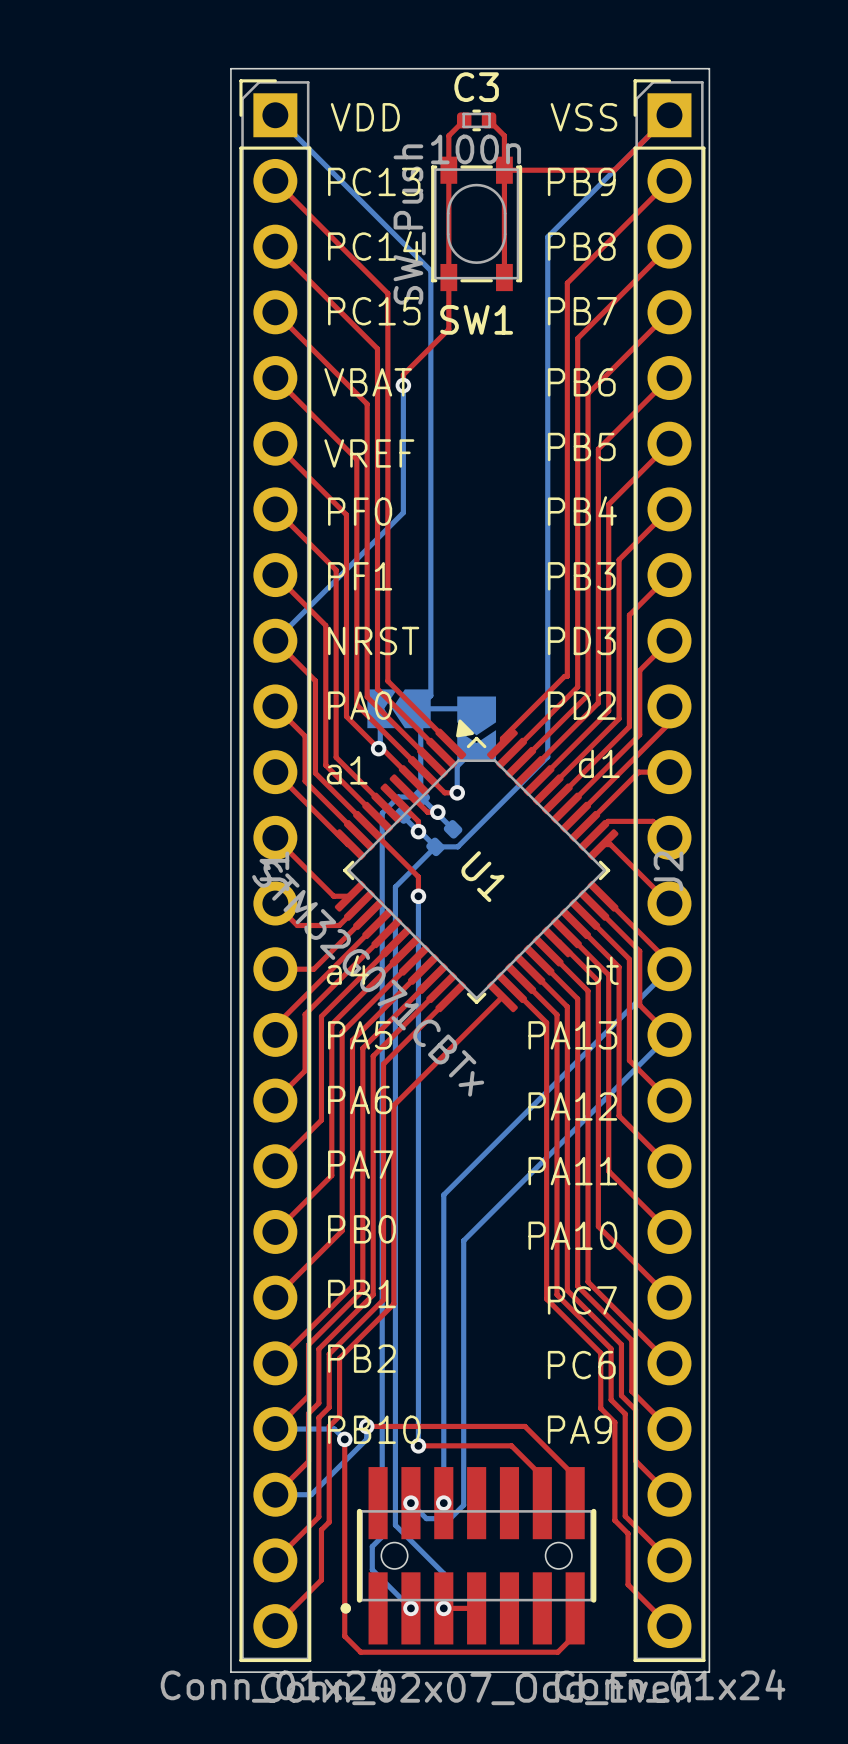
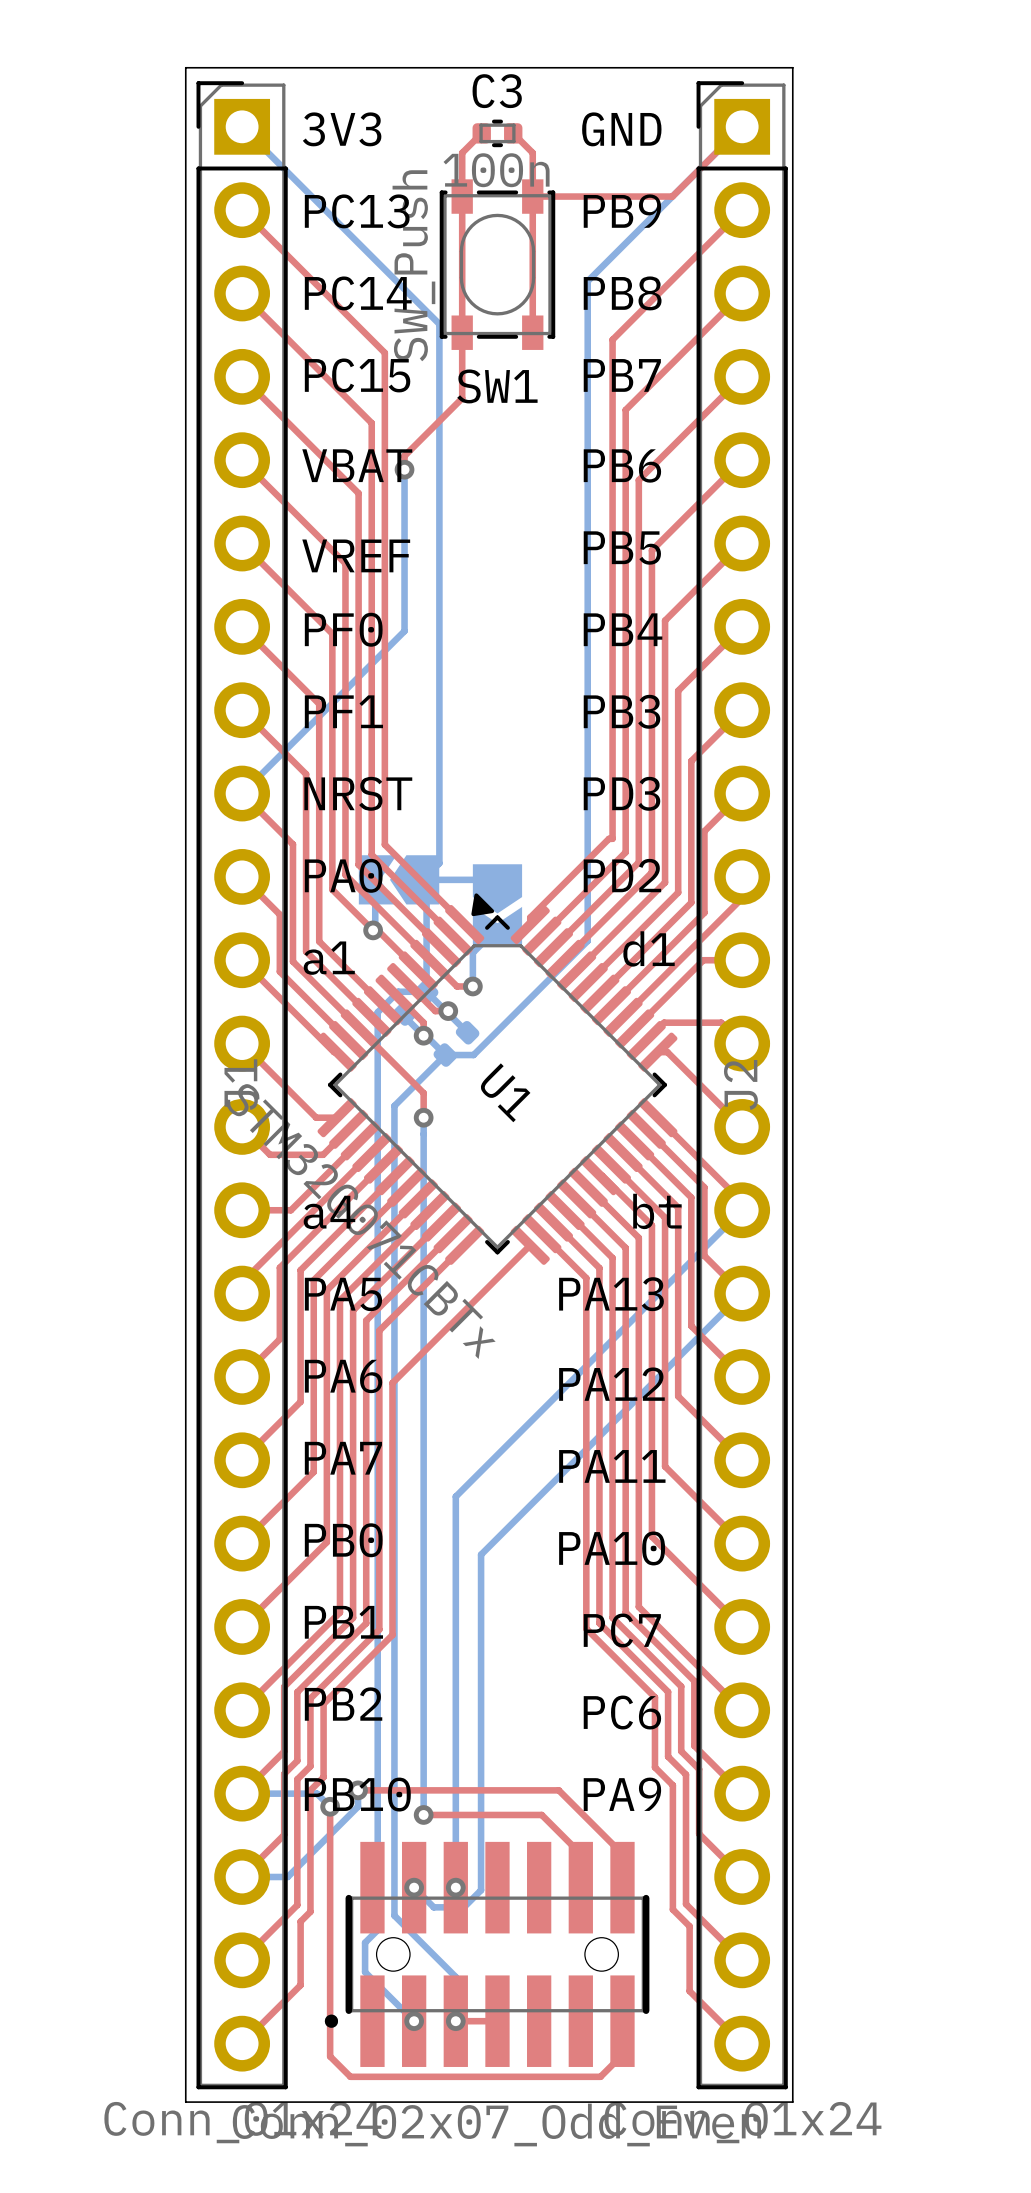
text: VDD (365, 117) -> 3V3 (342, 129)
text: VSS (583, 117) -> GND (621, 129)

